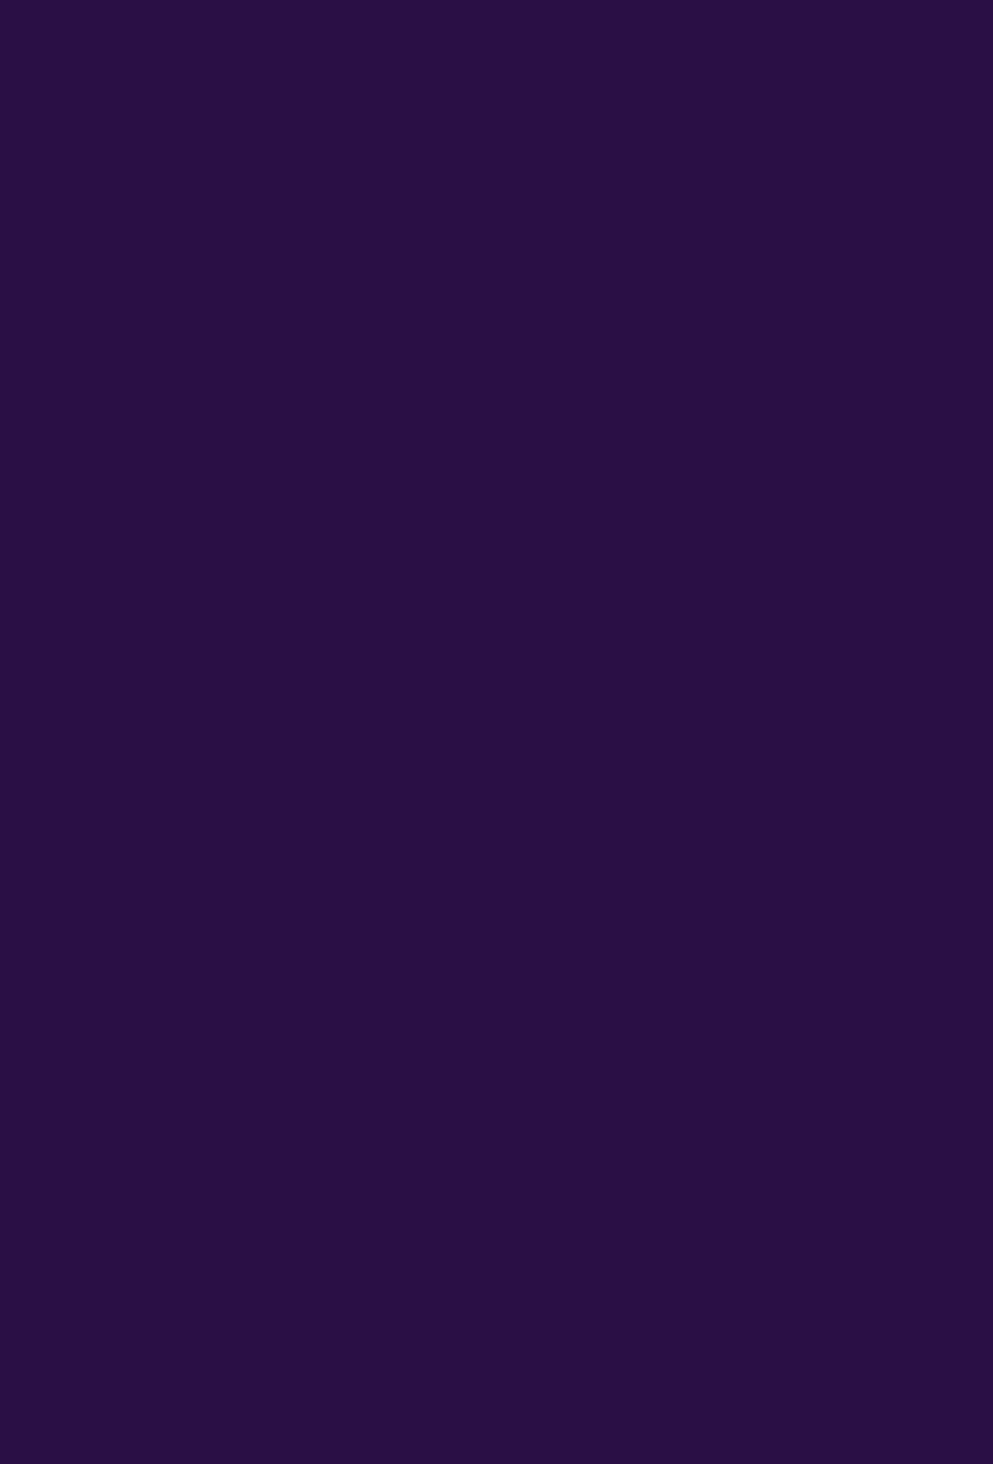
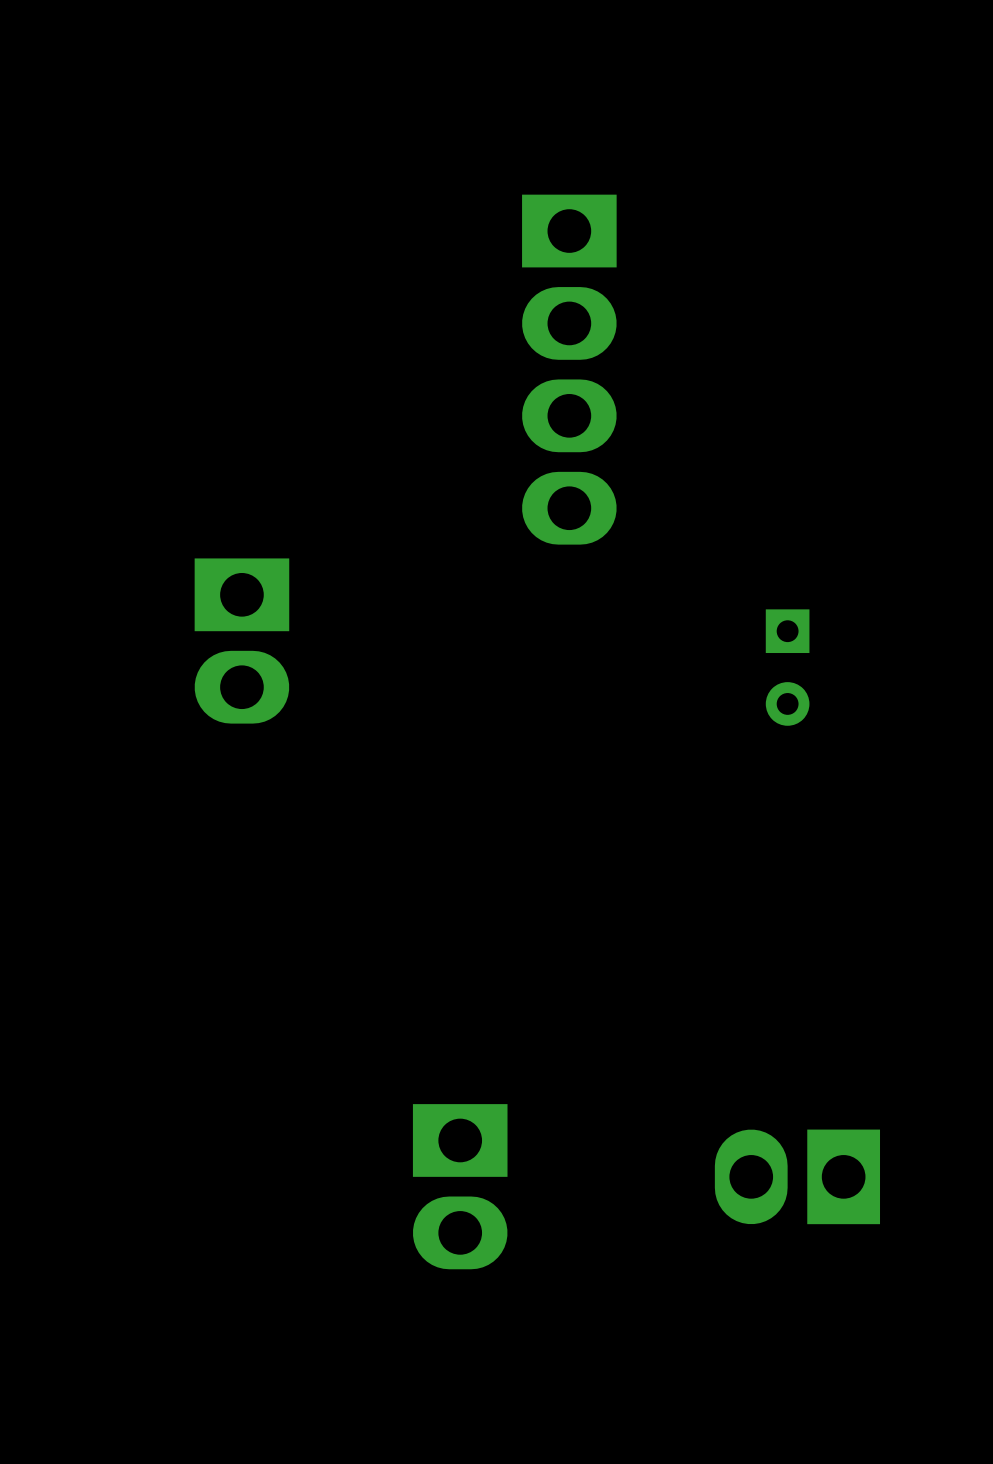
part: none -> (569, 369)
part: none -> (241, 641)
part: none -> (787, 667)
part: none -> (797, 1176)
part: none -> (460, 1186)

